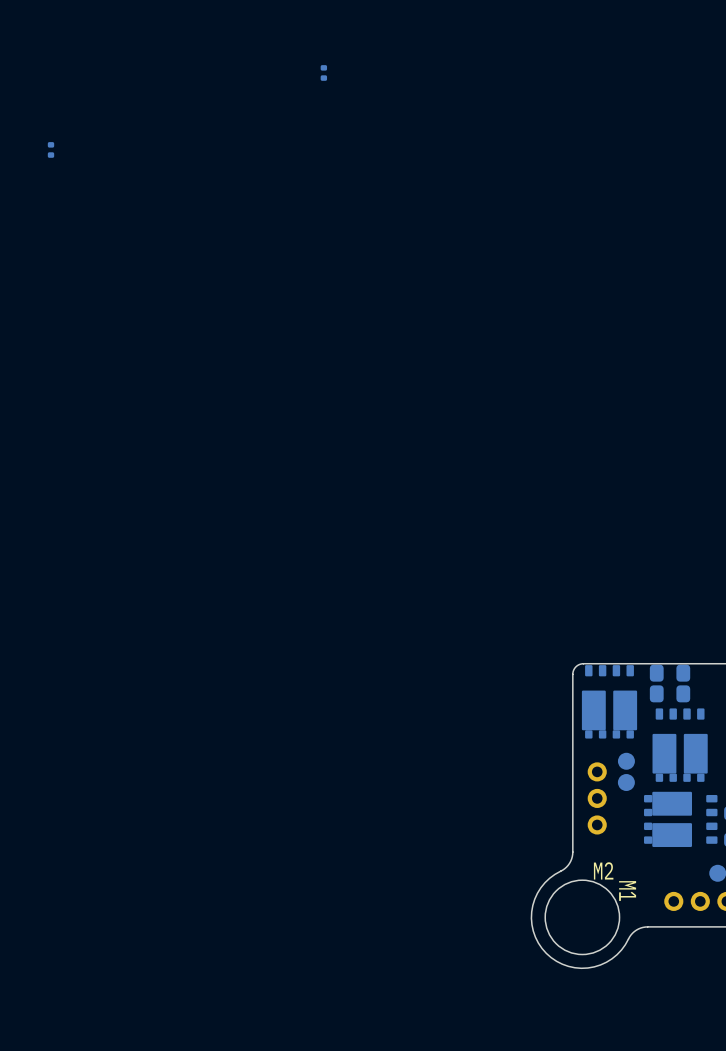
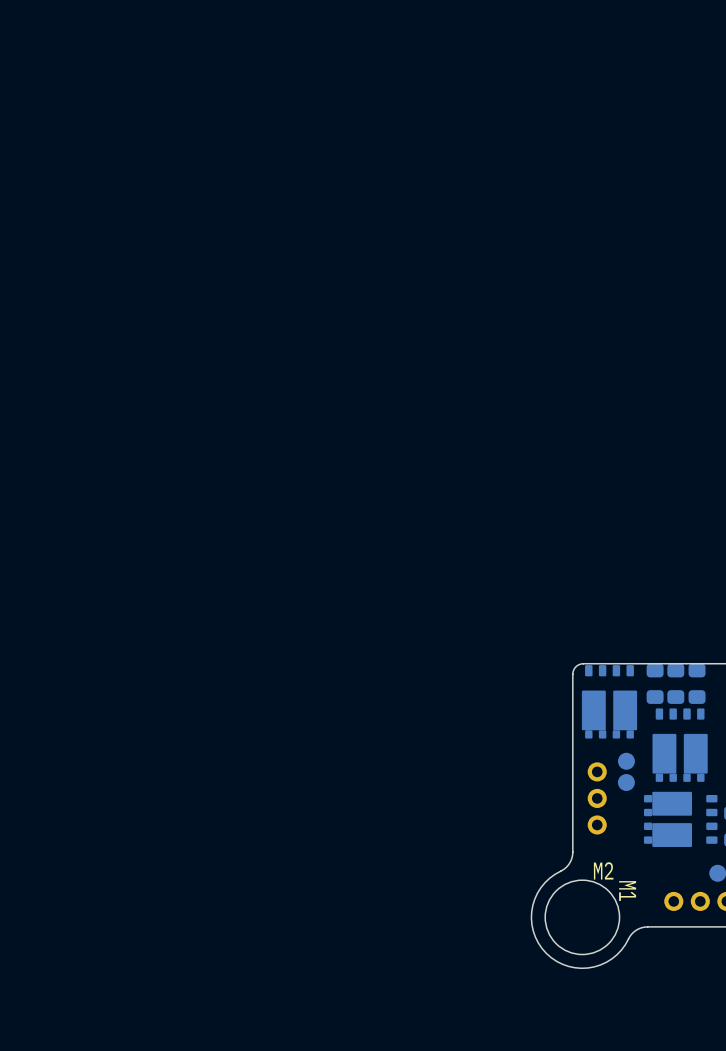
part: (323, 72) -> none
part: (51, 149) -> none
part: (670, 673) -> none
part: none -> (655, 683)
part: none -> (675, 683)
part: none -> (697, 683)
part: (670, 693) -> none

